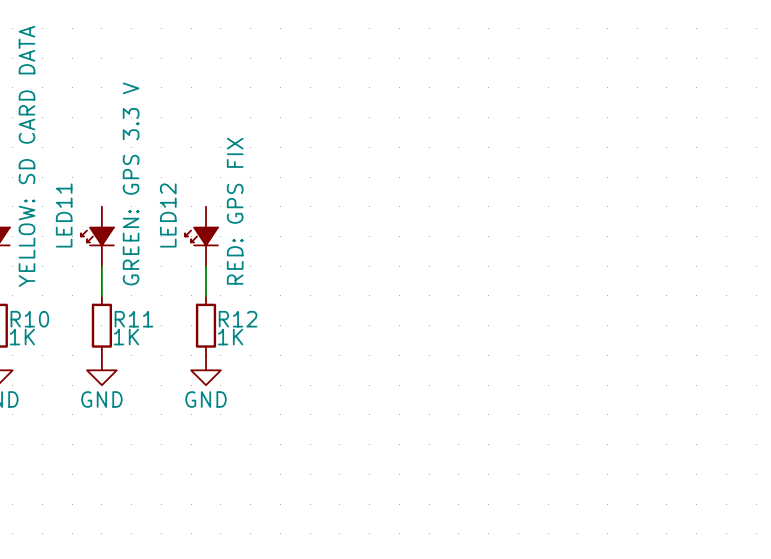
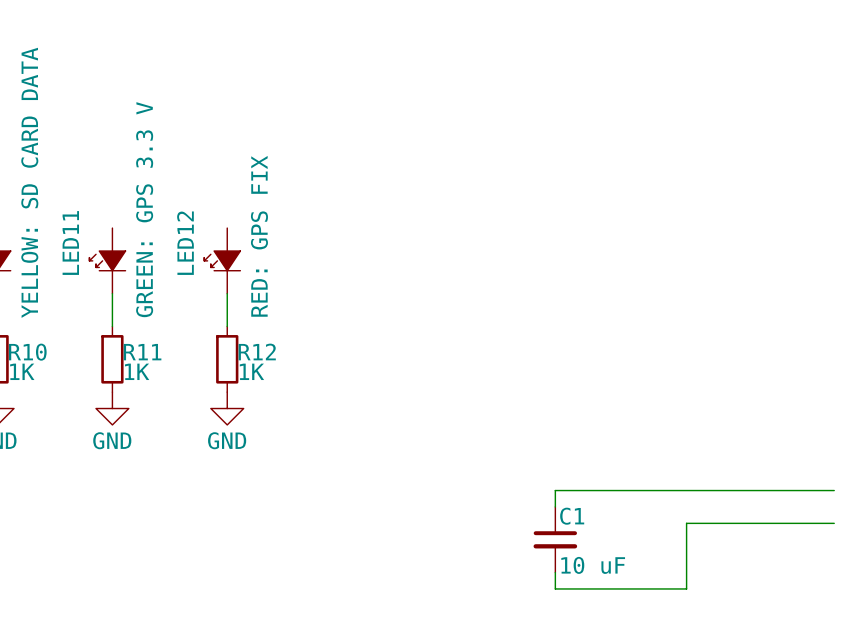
wire: none -> (834, 490) (555, 490) (555, 506)
wire: none -> (834, 523) (686, 523) (686, 588) (555, 588) (555, 572)
C1: none -> 10 uF (555, 539)

